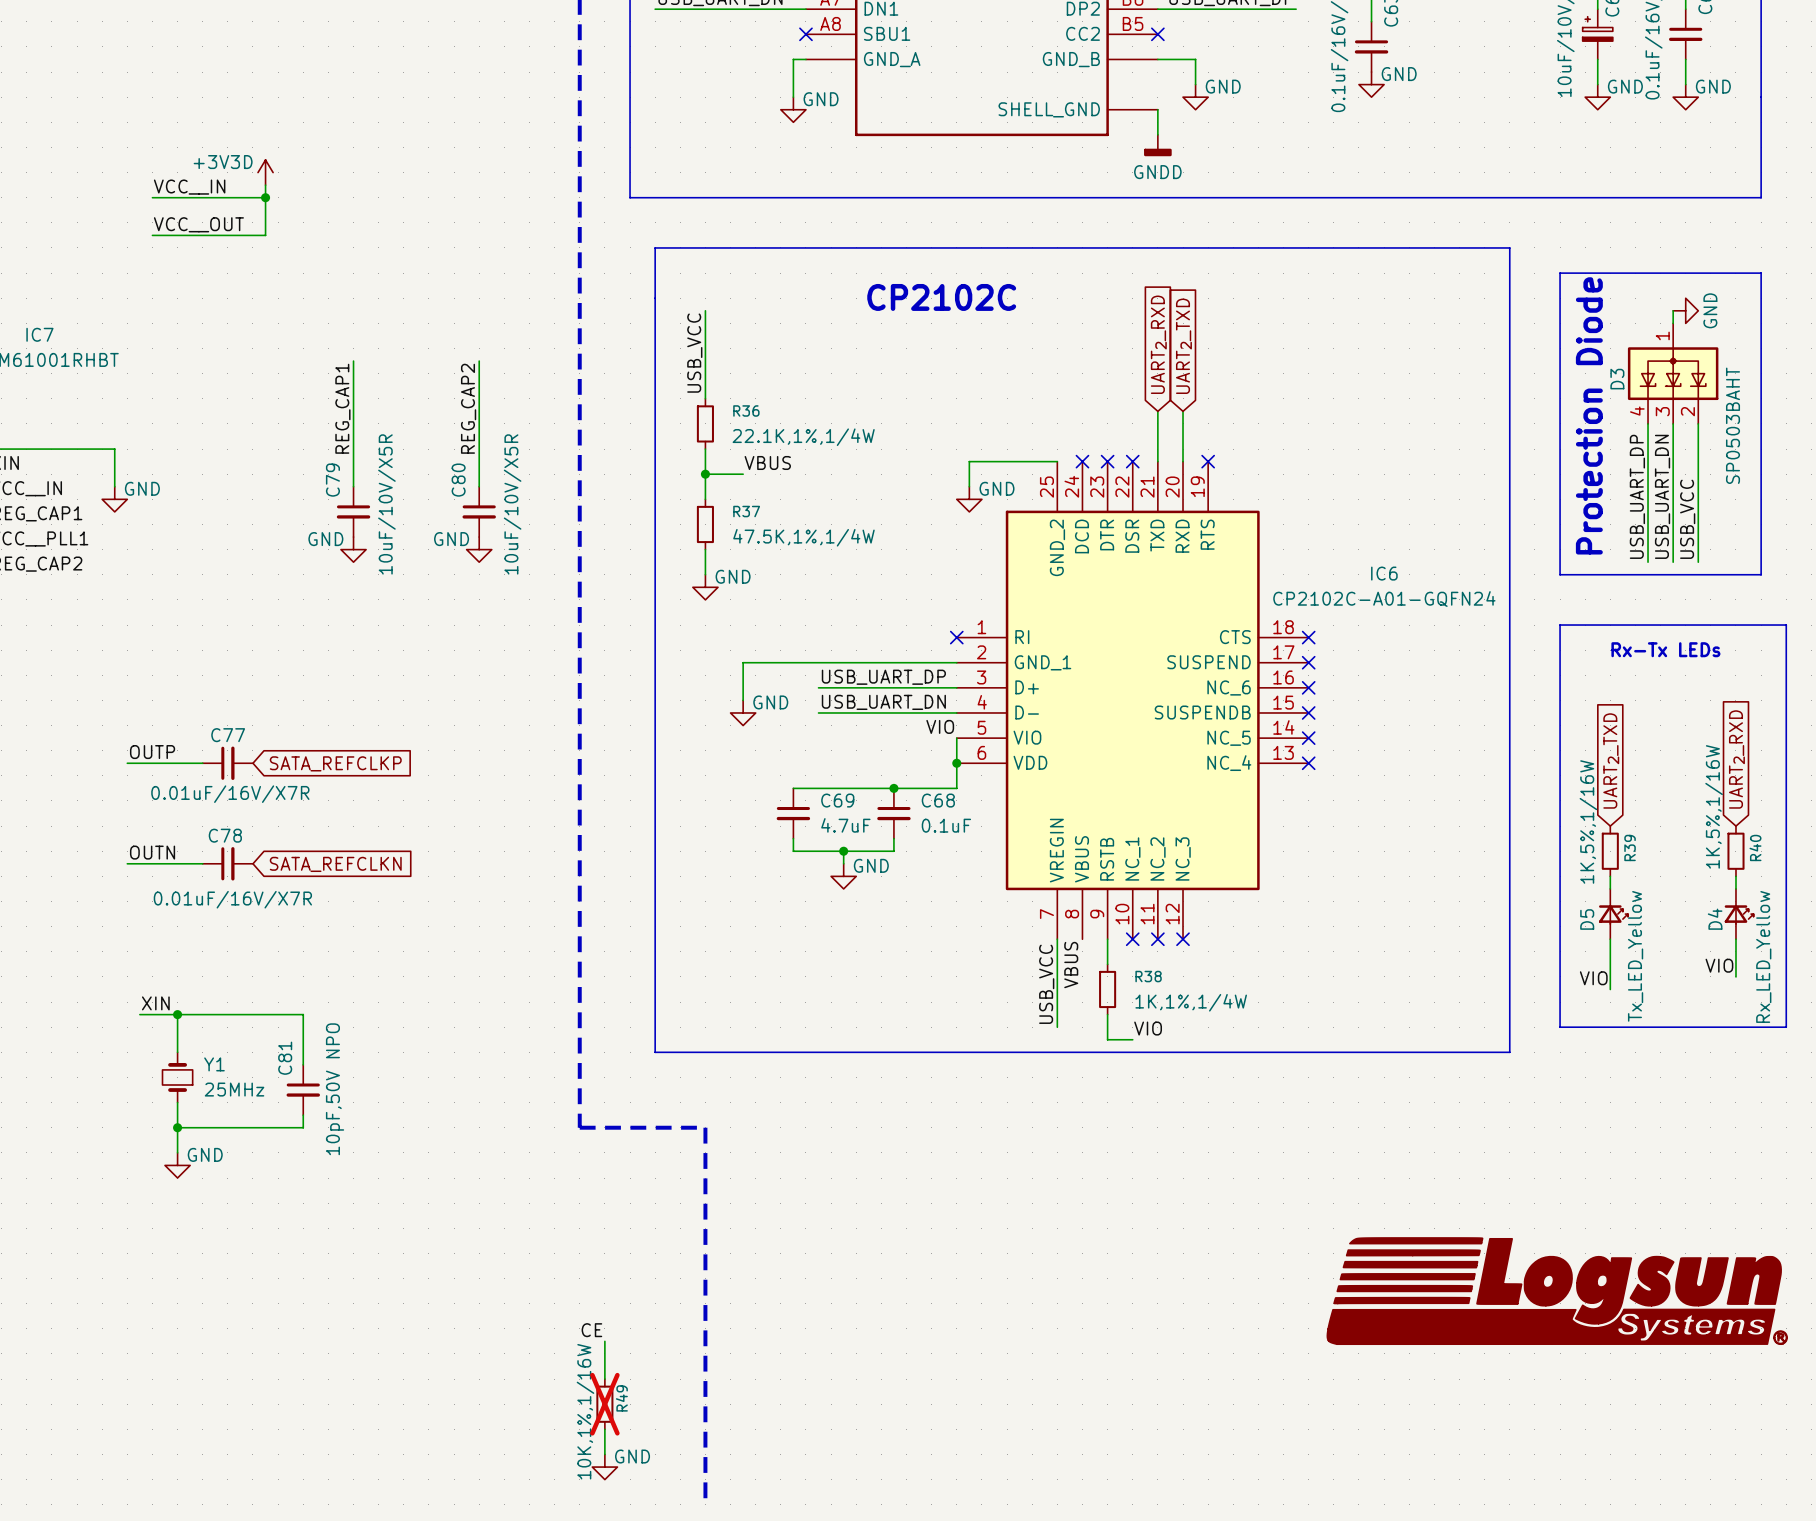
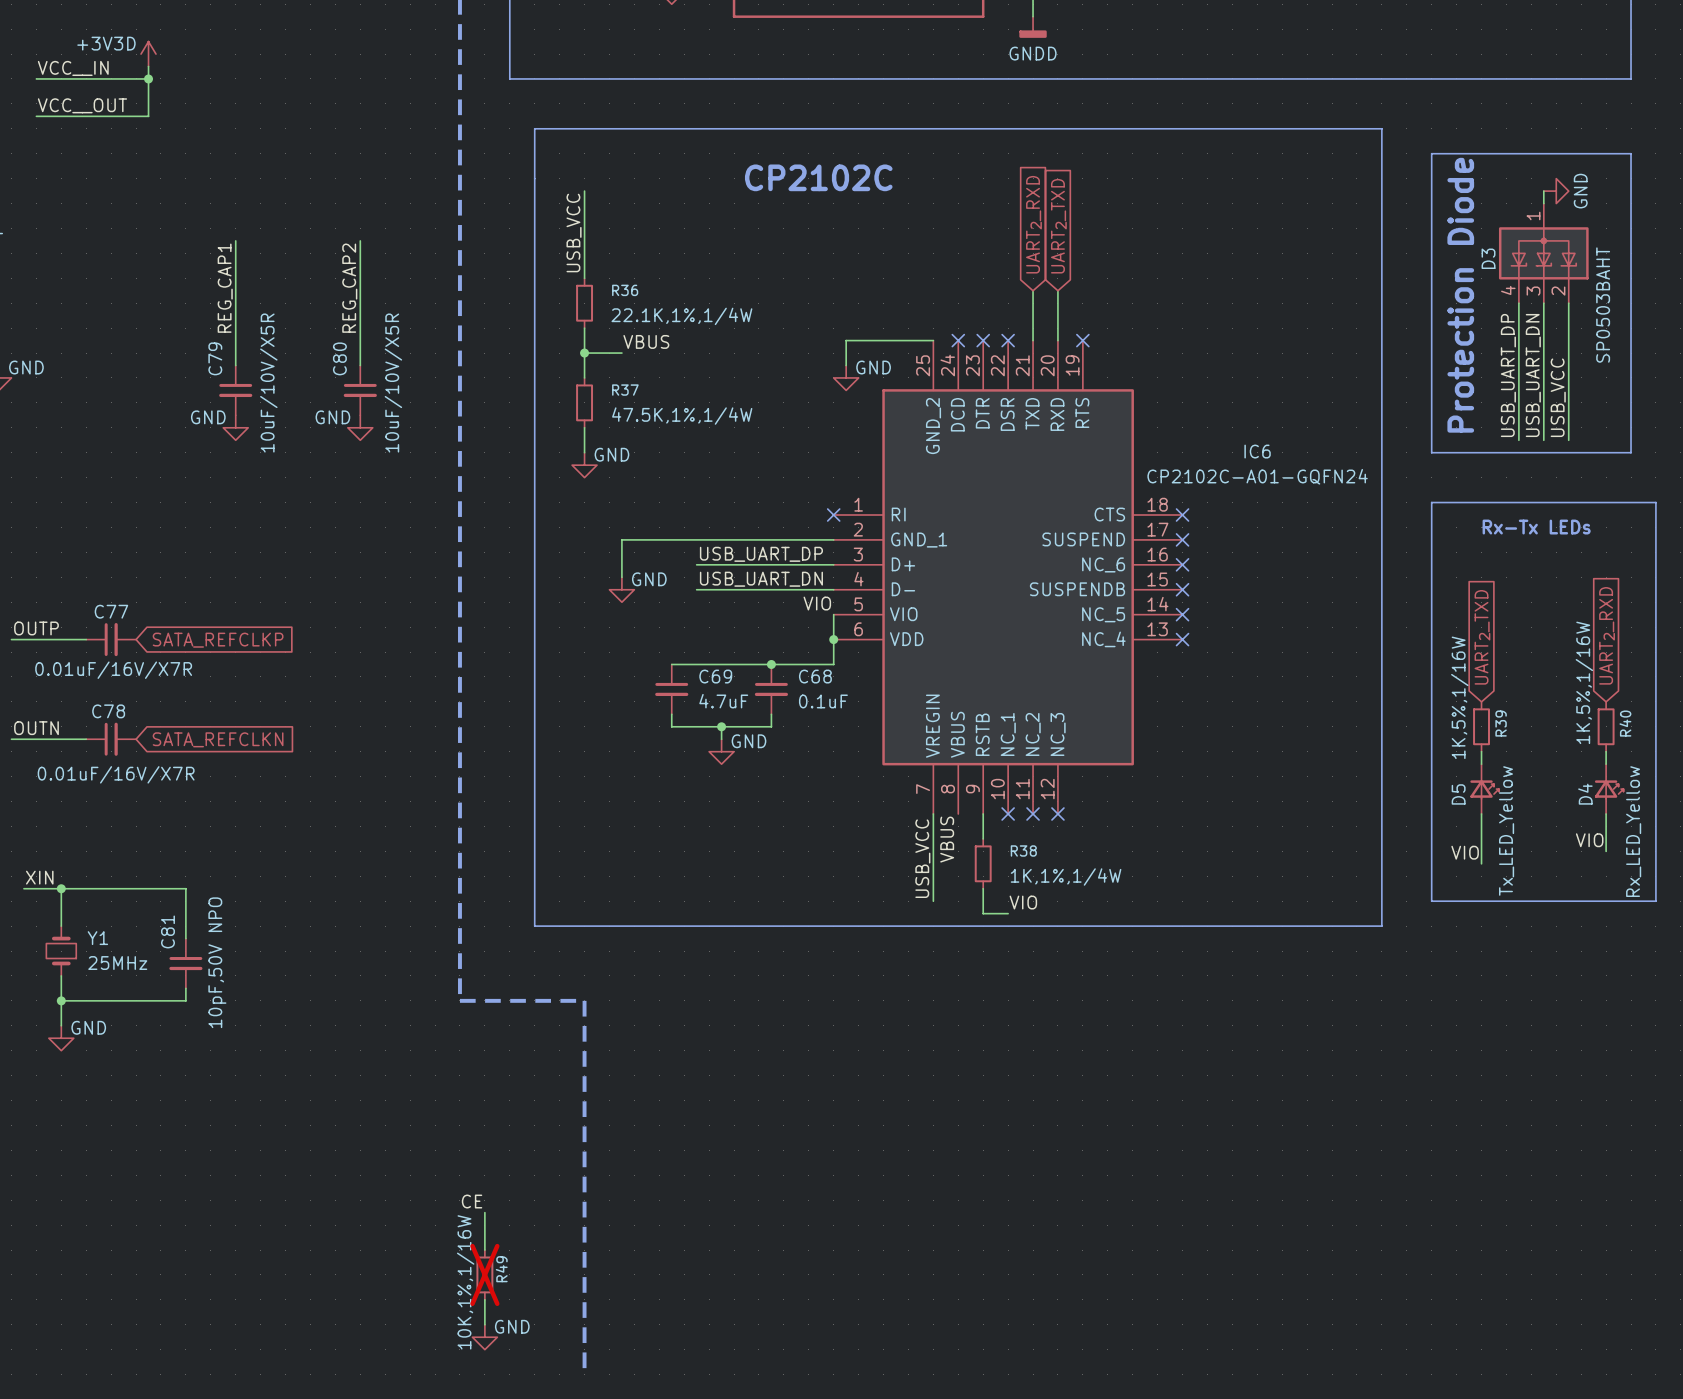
power symbol: (1557, 1291) -> none

